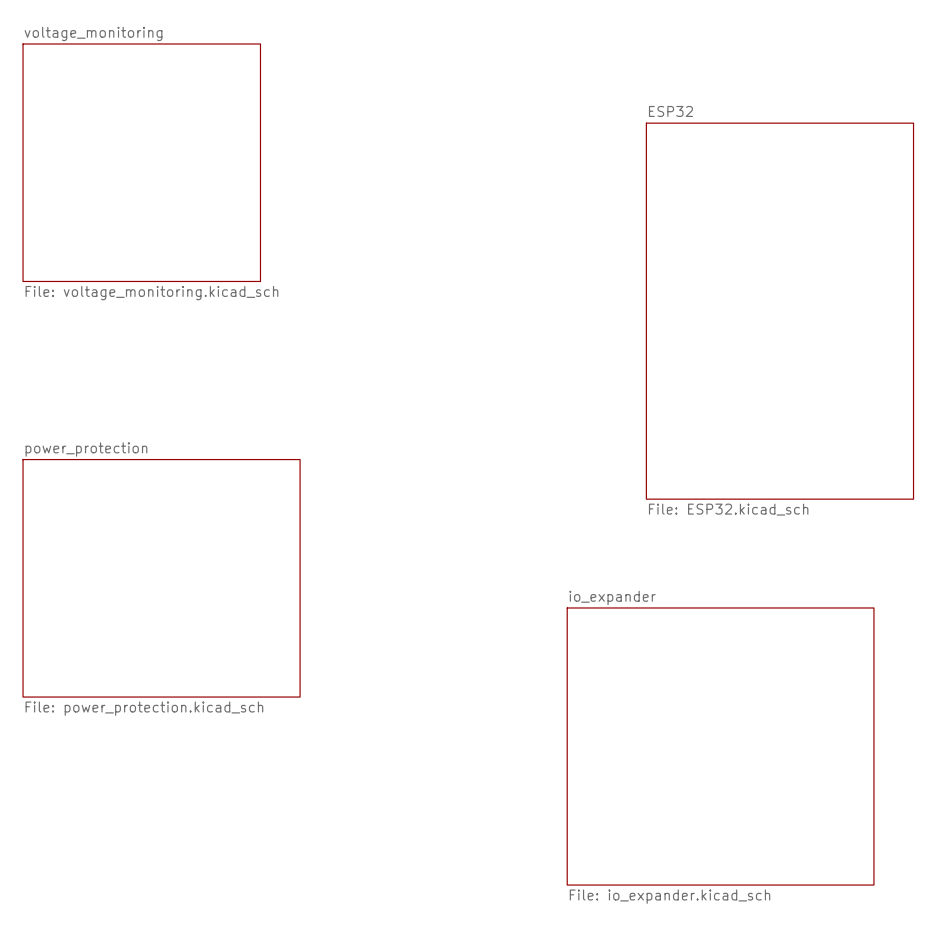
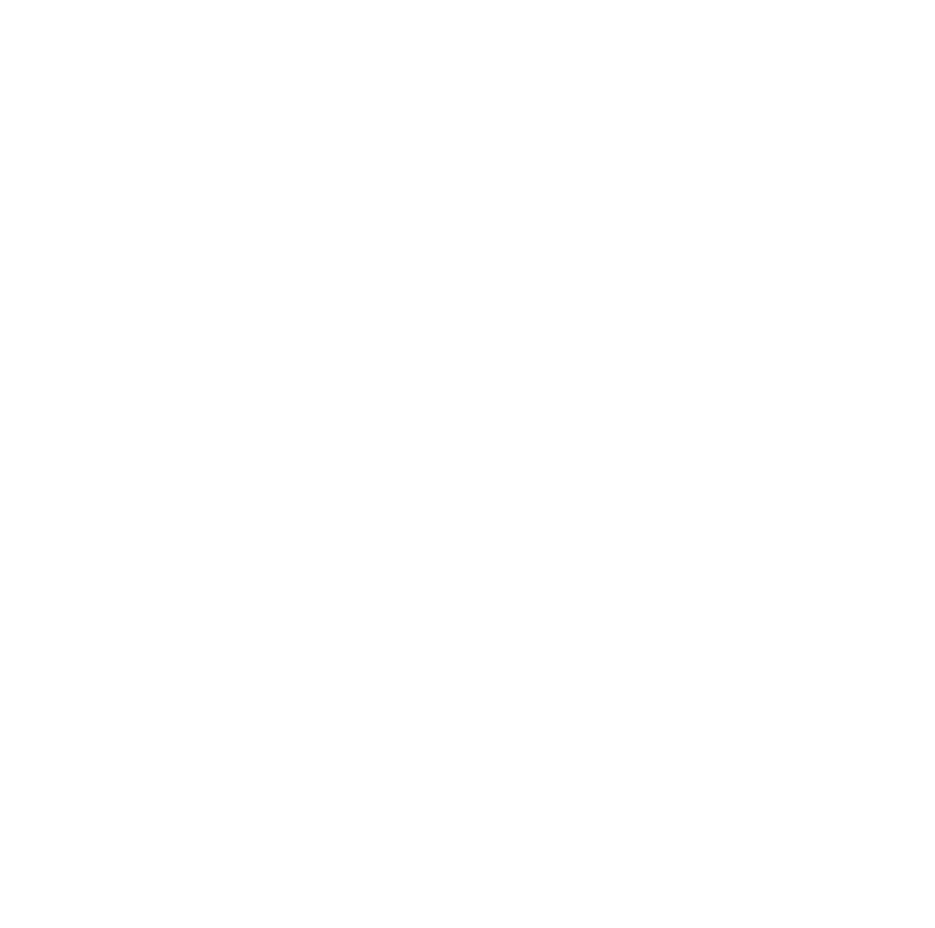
sheet voltage_monitoring: File: voltage_monitoring.kicad_sch (141, 162) -> none
sheet ESP32: File: ESP32.kicad_sch (779, 311) -> none
sheet power_protection: File: power_protection.kicad_sch (161, 578) -> none
sheet io_expander: File: io_expander.kicad_sch (720, 746) -> none

